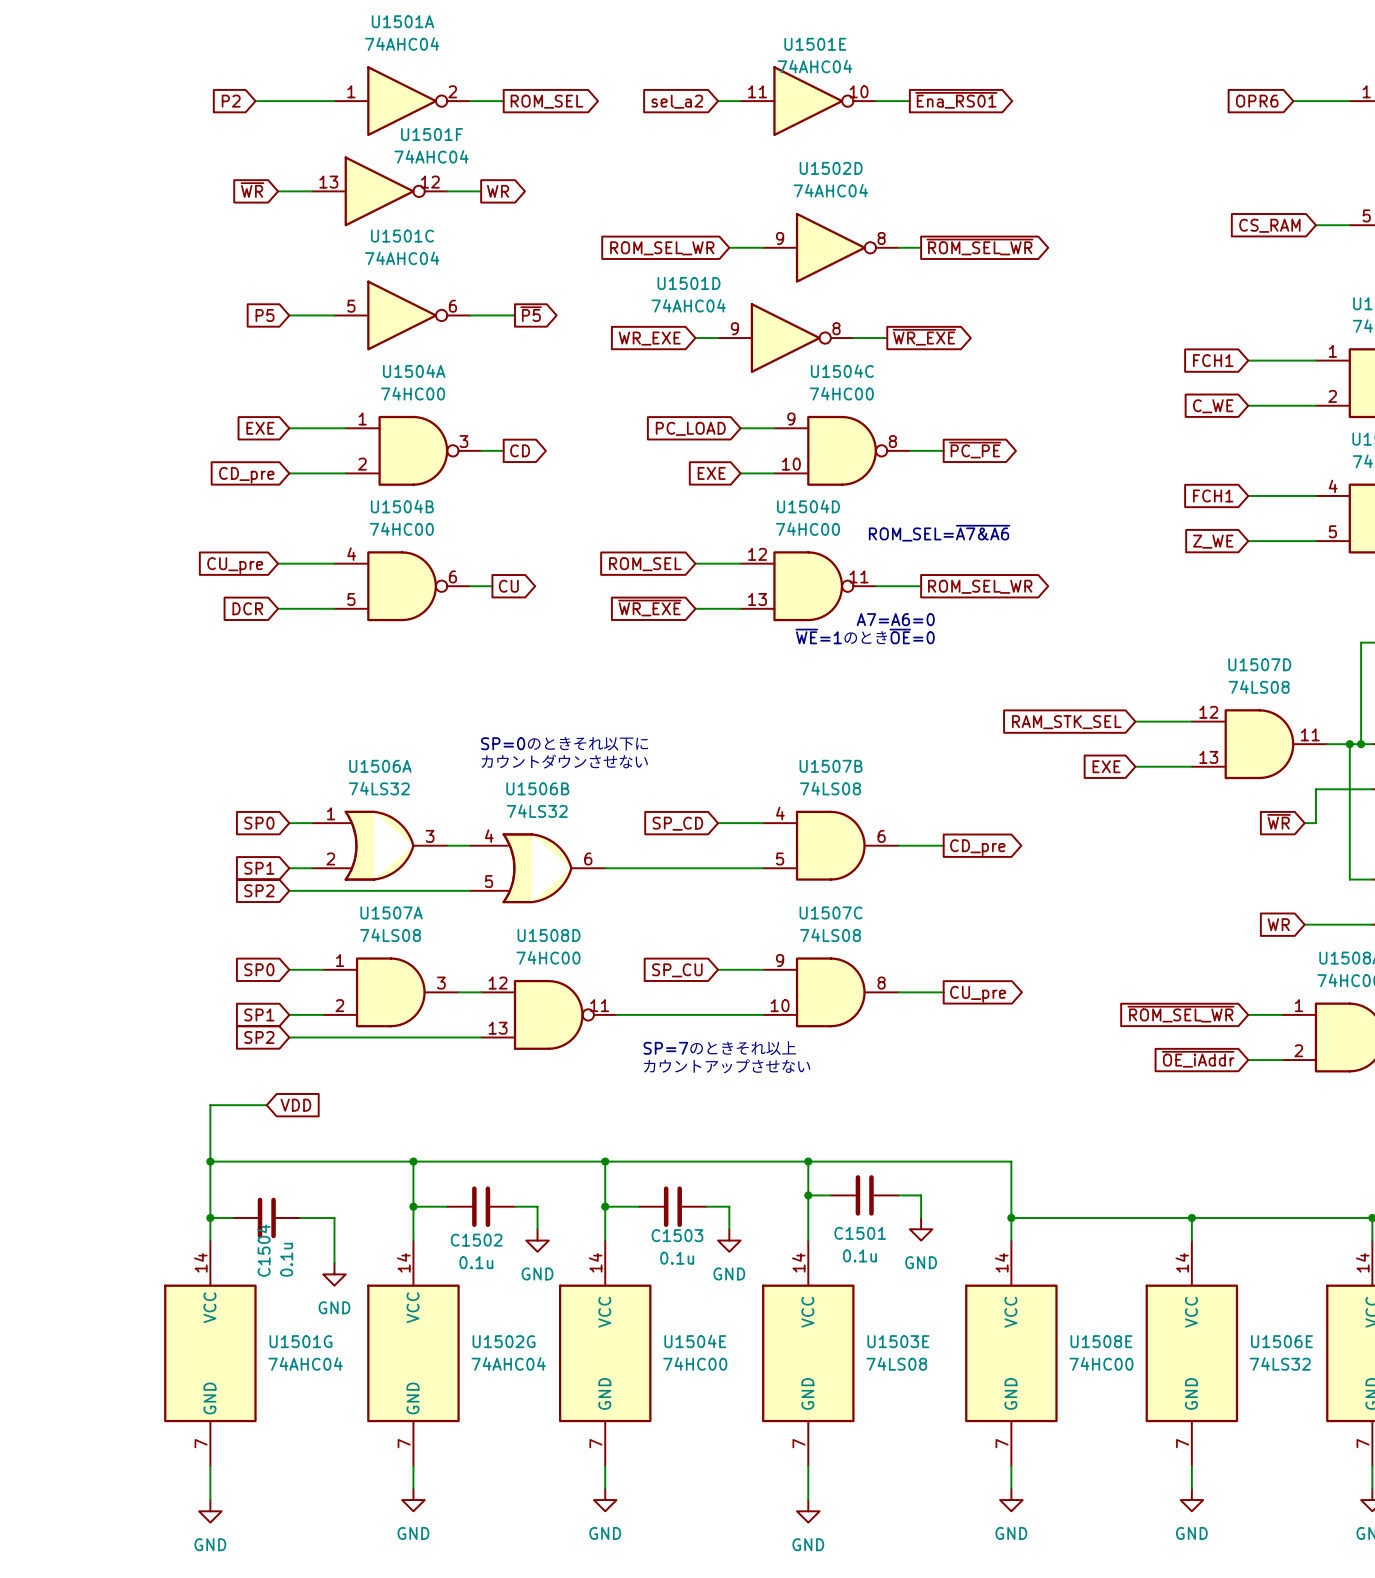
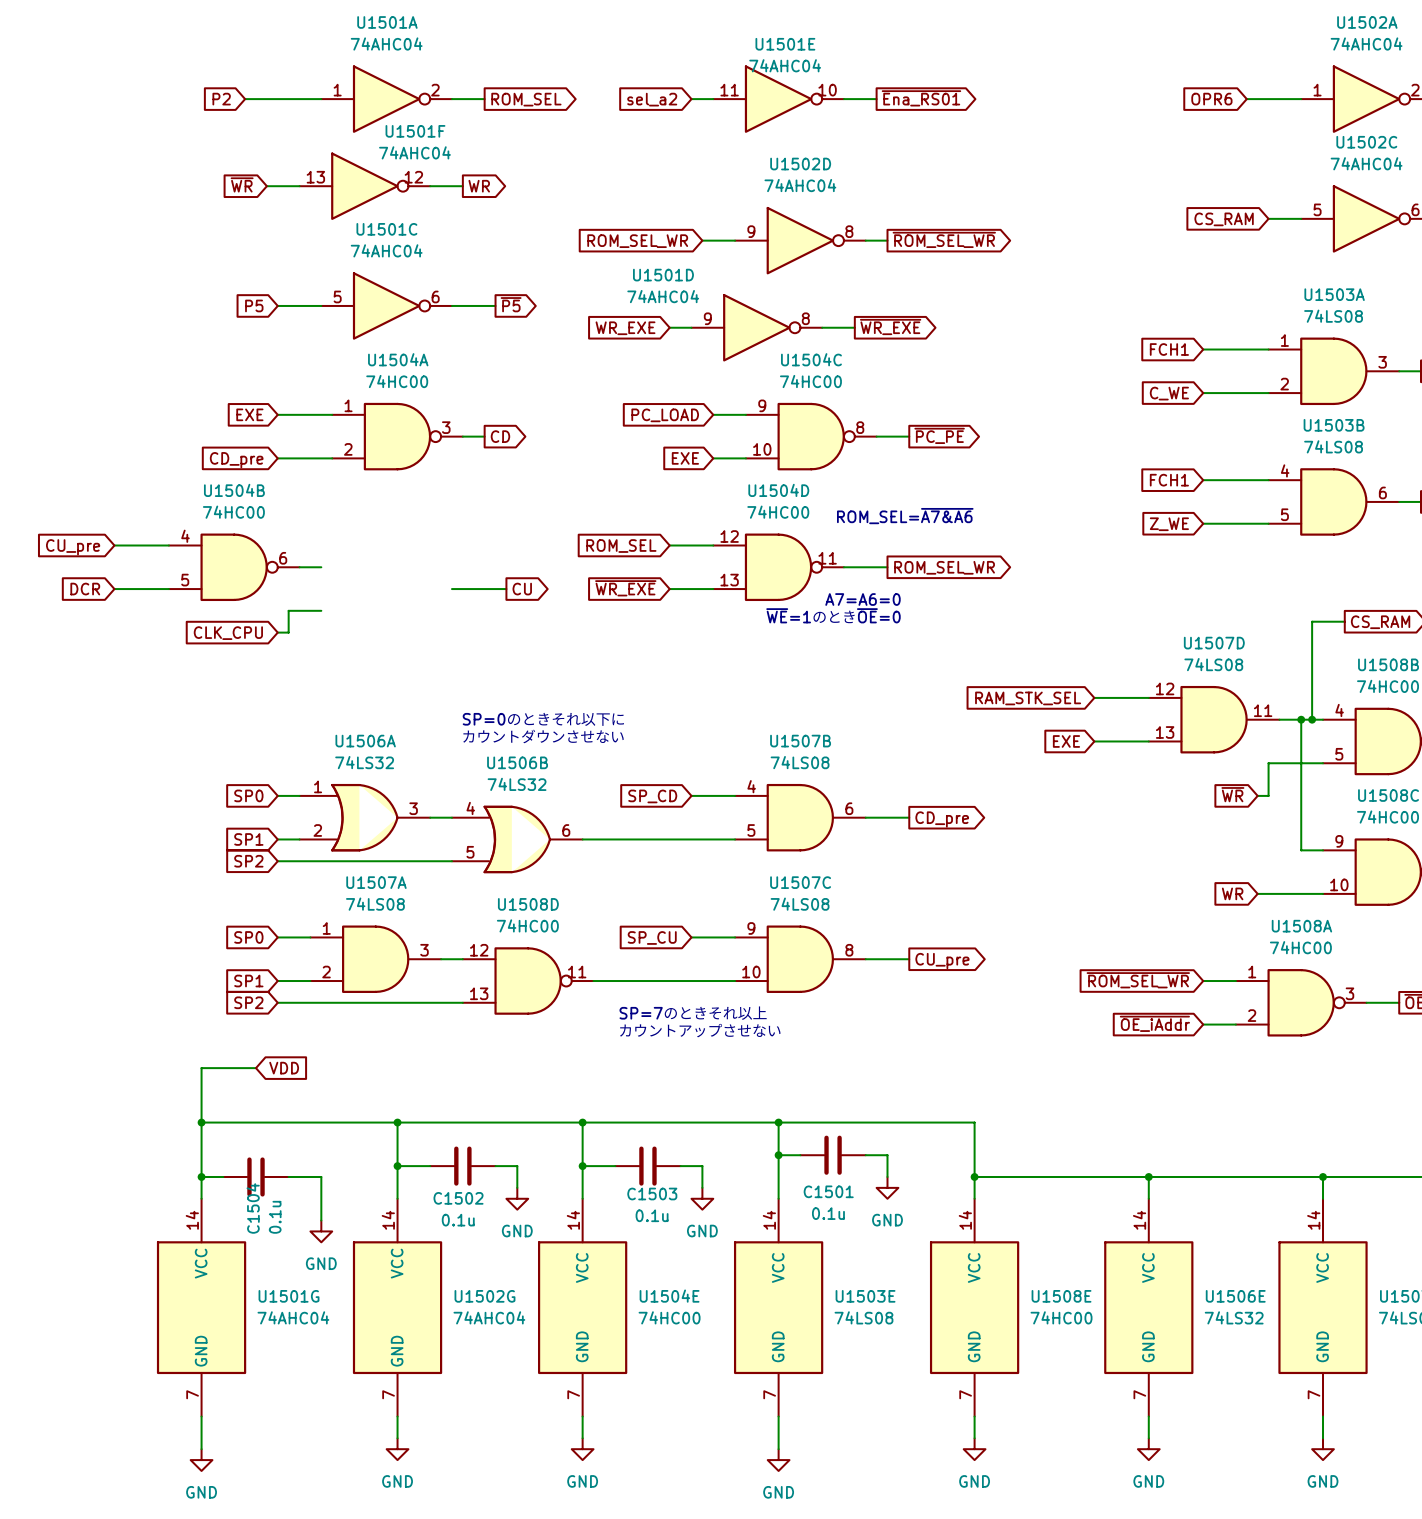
wire: (278, 563) (334, 563) -> (114, 545) (168, 545)
global label position: CU_pre (235, 565) -> CU_pre (73, 547)
U1504B position: (402, 586) -> (234, 567)
wire: (469, 586) (492, 586) -> (299, 567) (321, 567)
global label position: CU (508, 586) -> CU (522, 589)
global label position: DCR (247, 608) -> DCR (85, 589)
wire: (278, 608) (334, 608) -> (114, 589) (168, 589)
wire: none -> (451, 589) (506, 589)
wire: none -> (321, 610) (288, 610) (288, 632) (277, 632)
global label: none -> CLK_CPU (228, 633)

